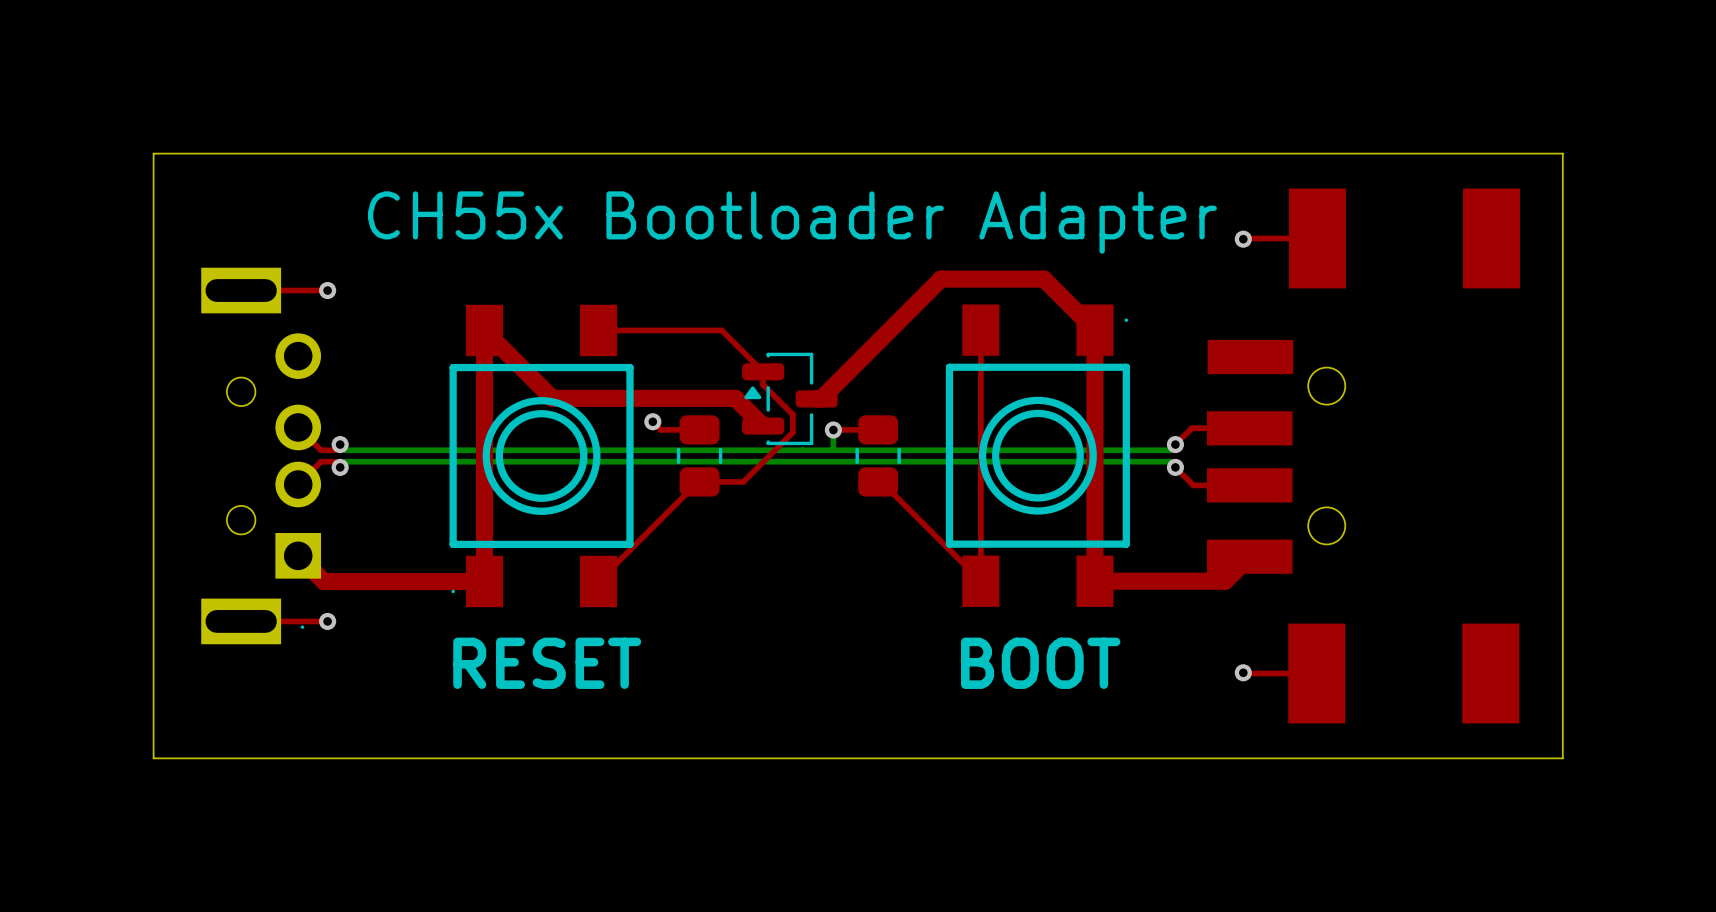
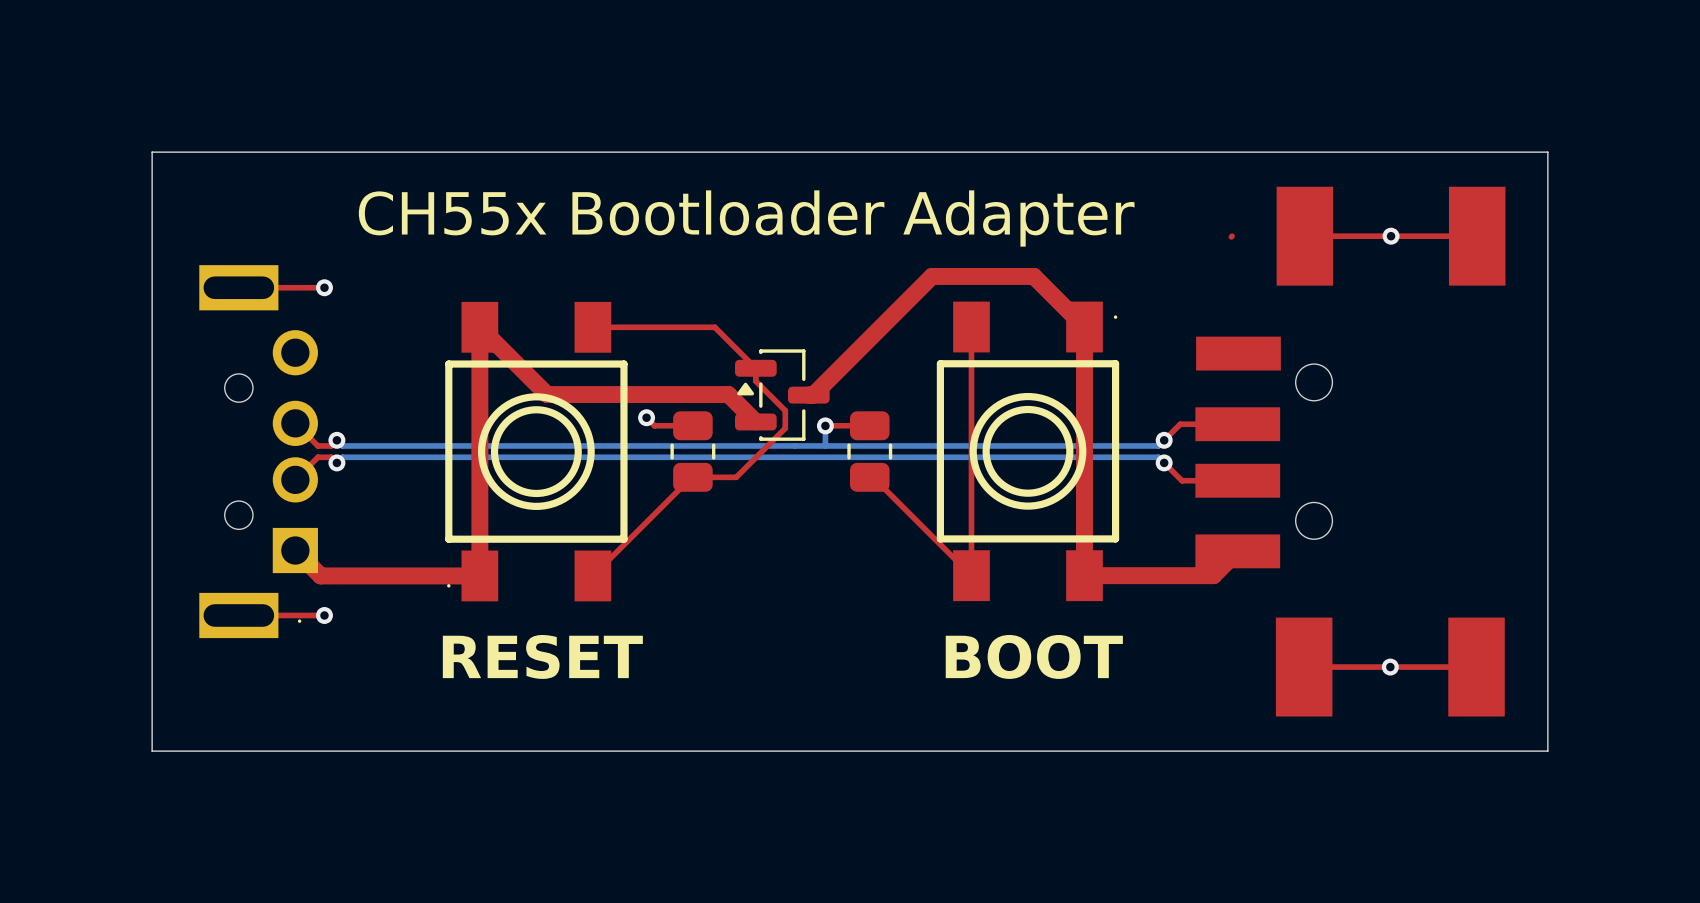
top track: (1244, 238) (1317, 238) -> (1477, 236) (1304, 236)
via position: (1243, 239) -> (1391, 236)
top track: (1243, 672) (1316, 673) -> (1476, 667) (1304, 667)
via position: (1243, 672) -> (1390, 667)

